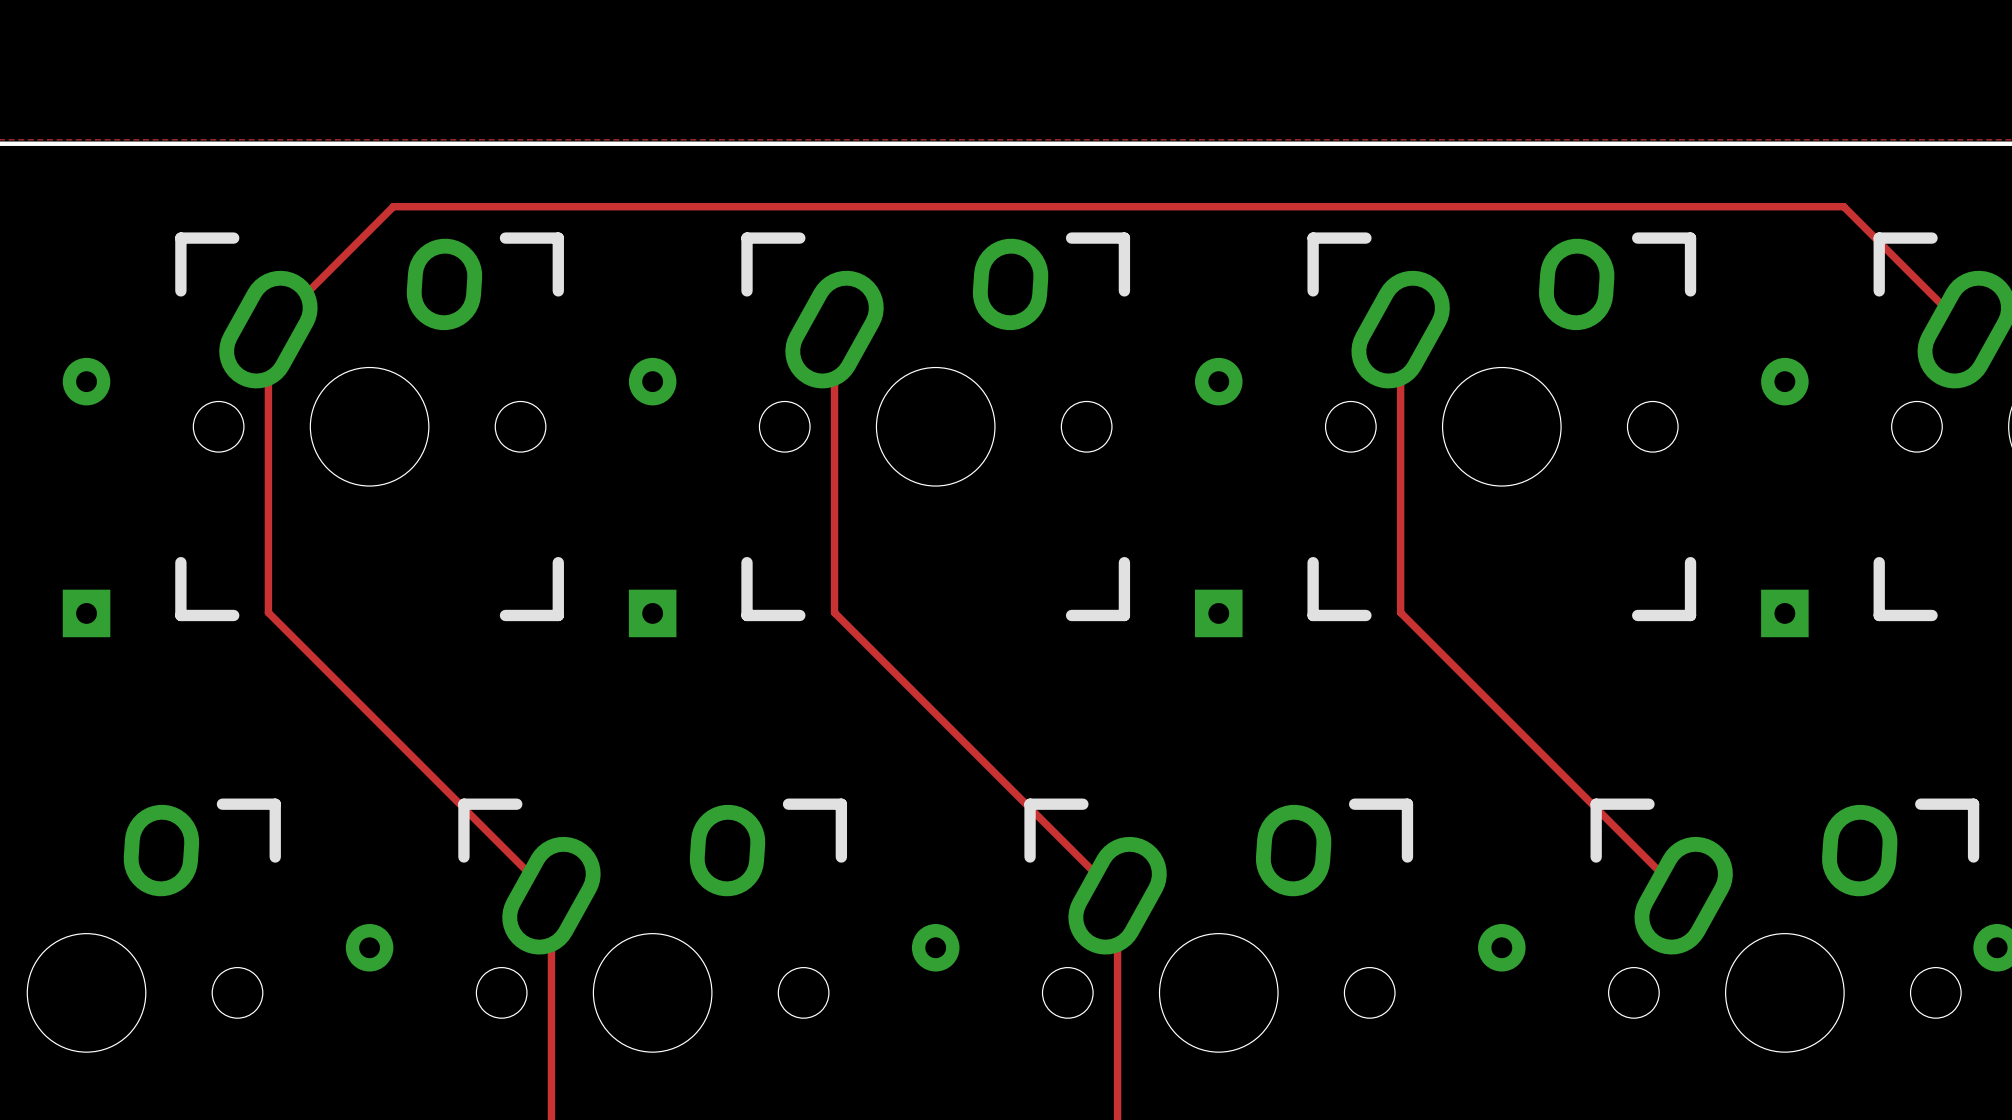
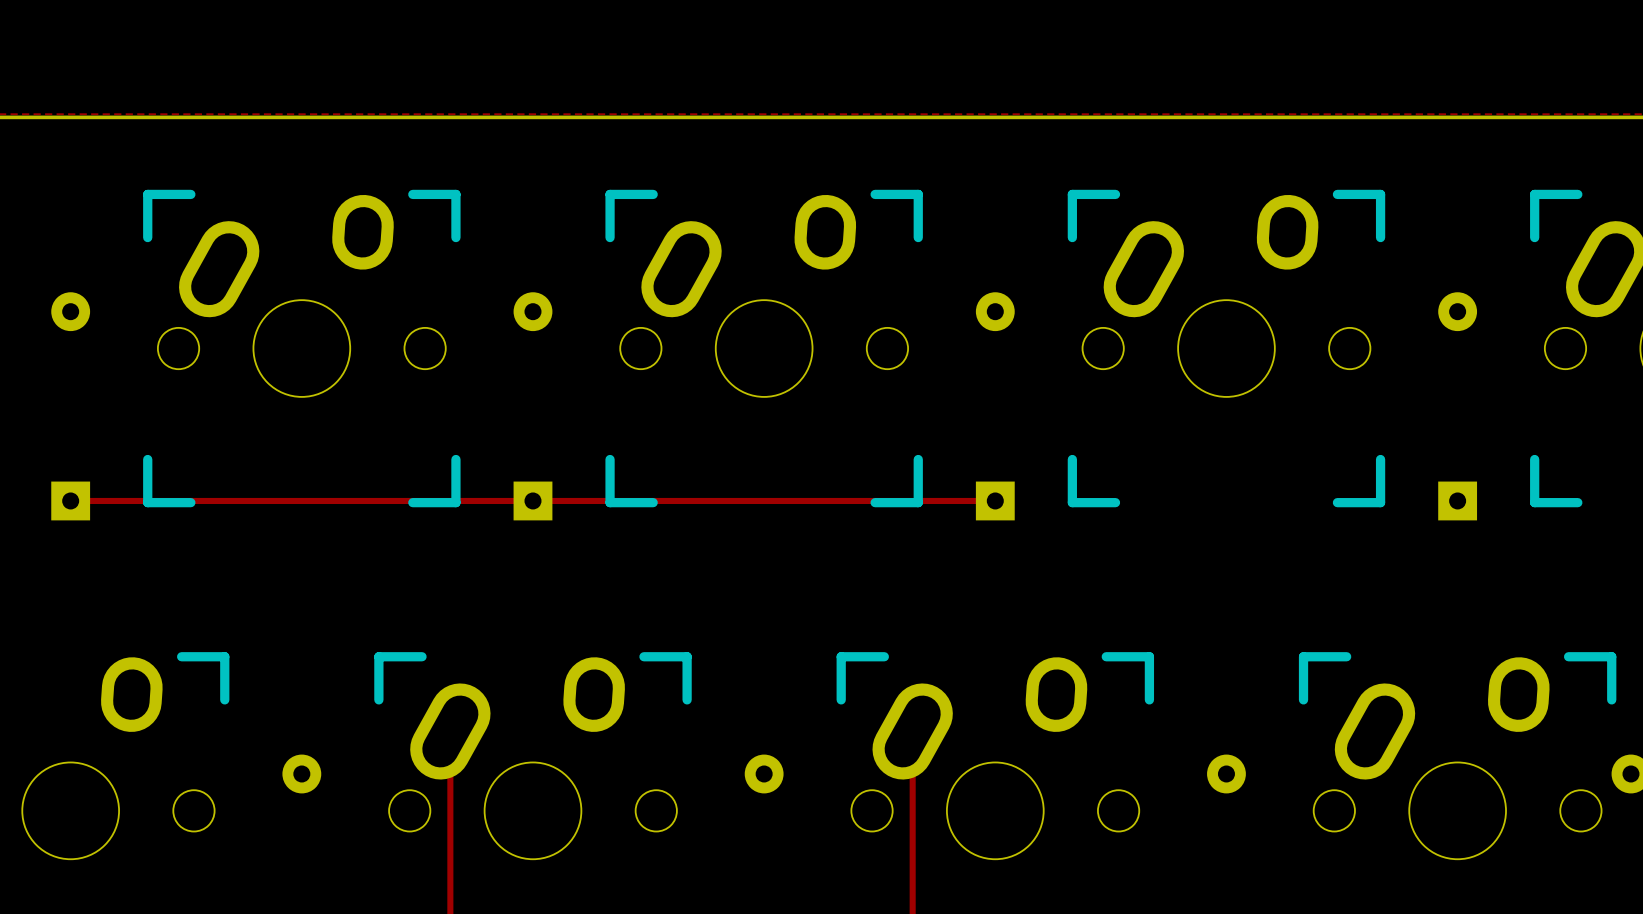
track: (834, 329) (834, 612) (1117, 895) -> none
track: (1400, 329) (1400, 612) (1683, 895) -> none
track: (1966, 329) (1843, 206) (393, 206) (268, 329) (268, 612) (551, 895) -> none
track: none -> (70, 500) (995, 500)

